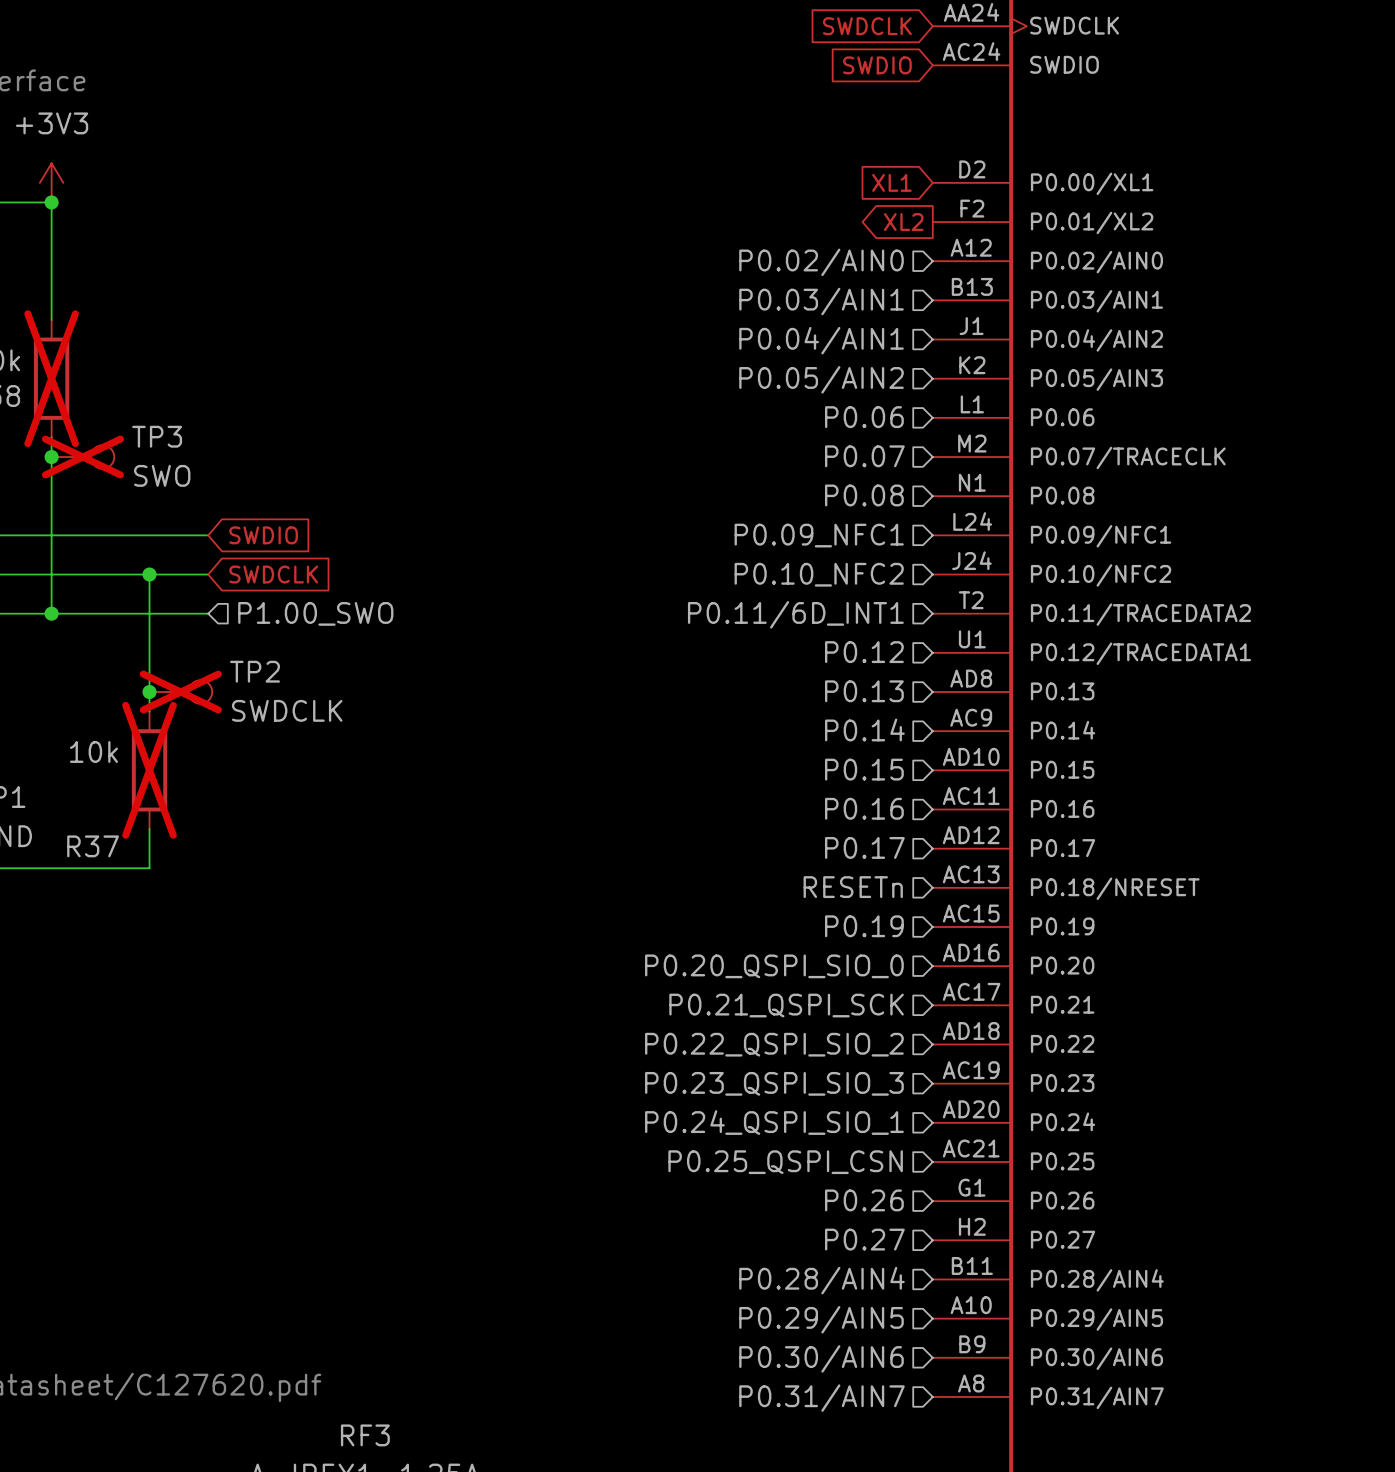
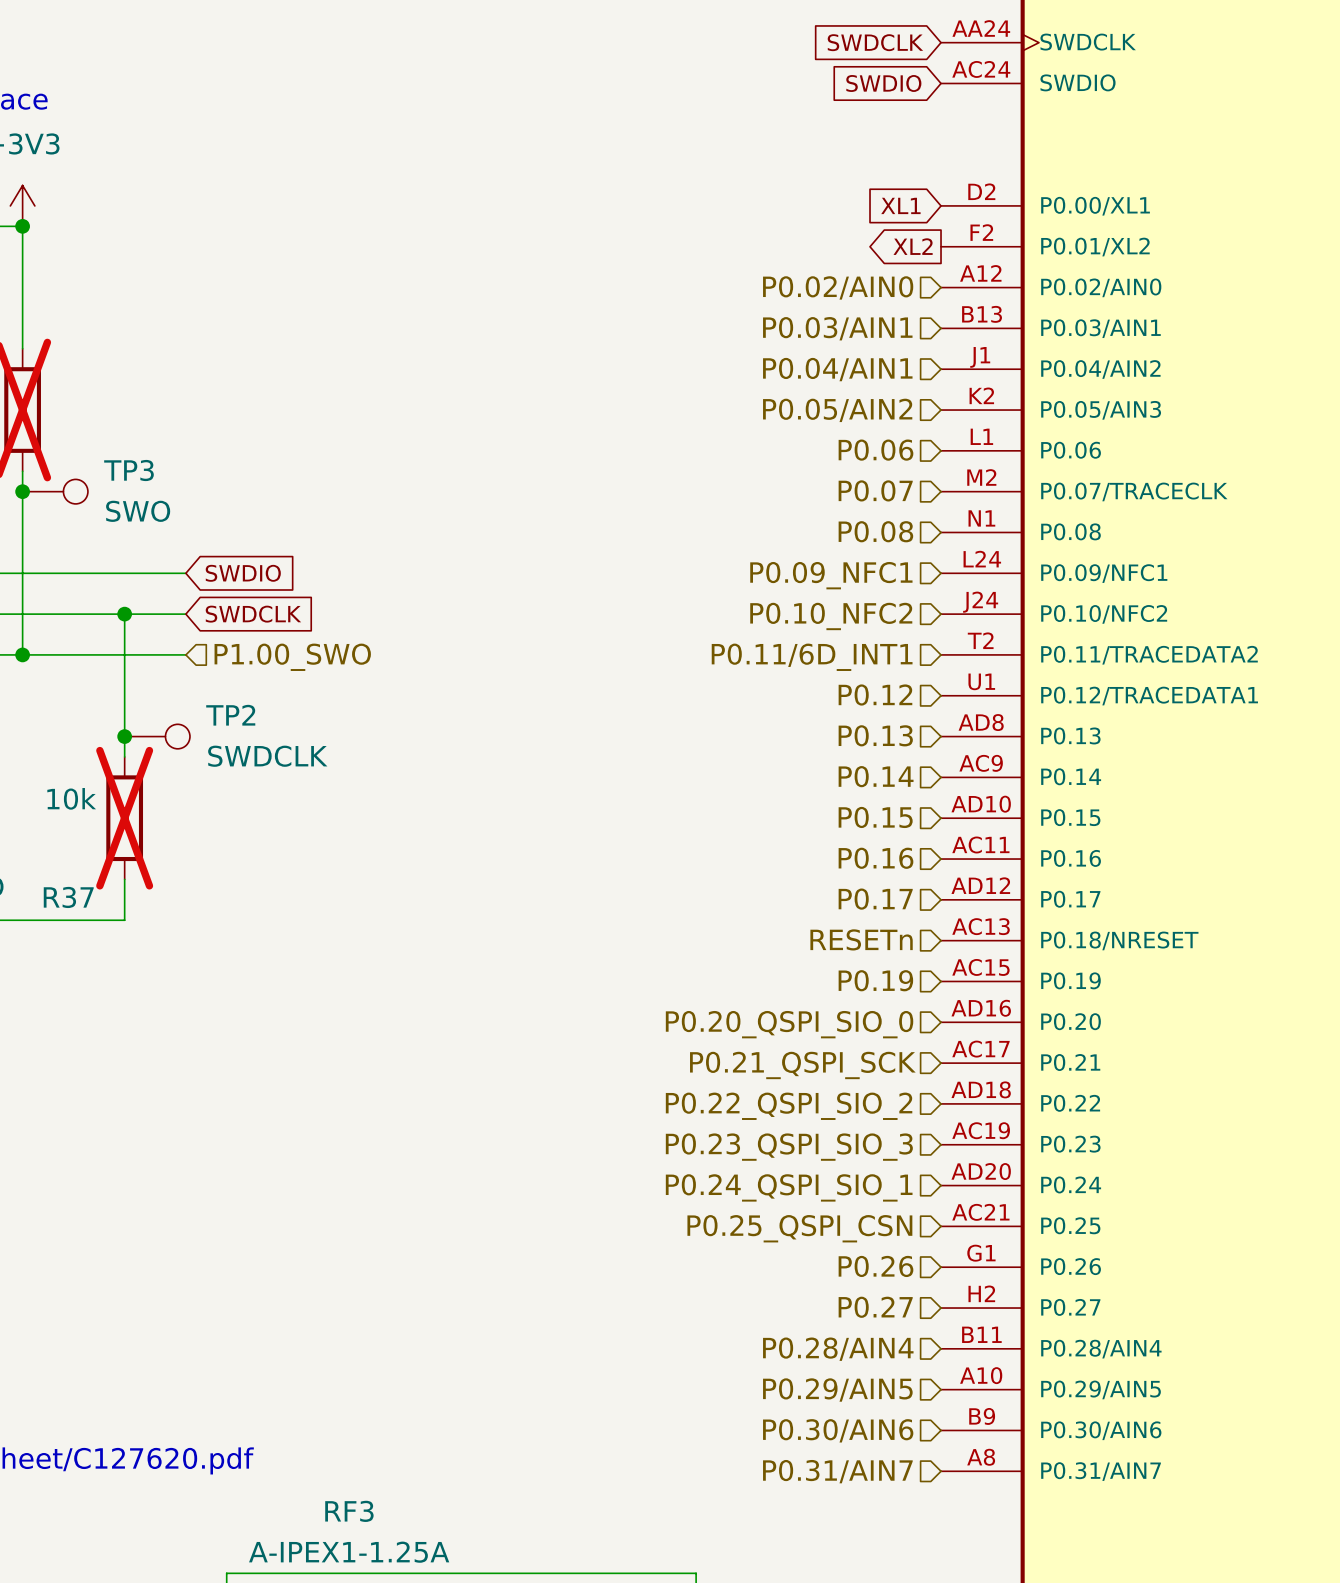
TP3 do-not-place cross: (82, 457) -> none
TP2 do-not-place cross: (180, 692) -> none

